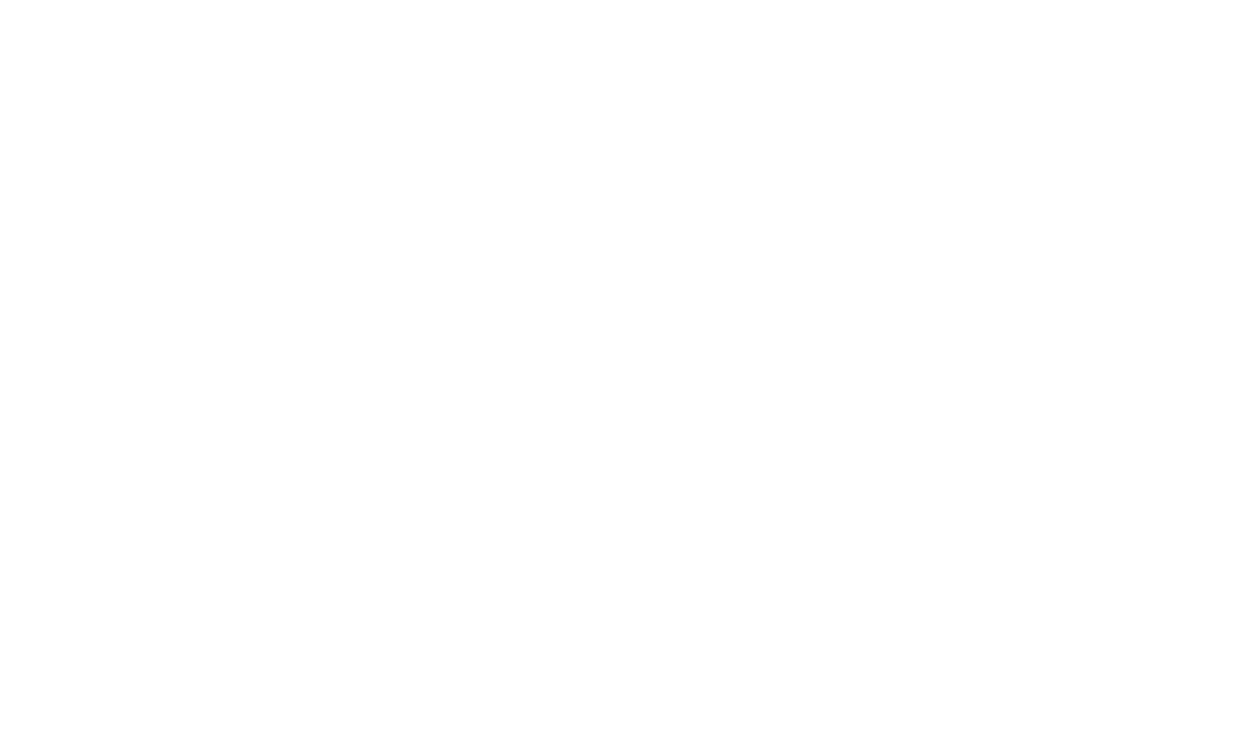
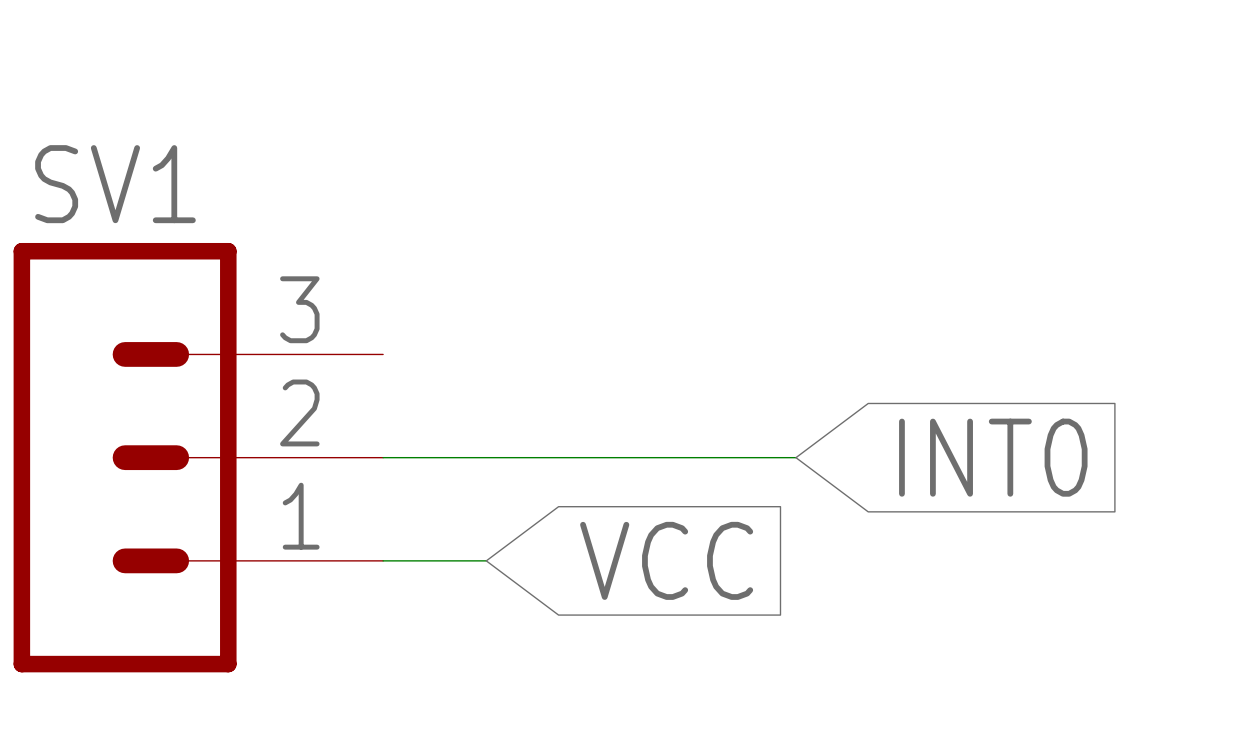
SV1: none -> (198, 457)
wire: none -> (383, 457) (795, 457)
global label: none -> INT0 (993, 457)
wire: none -> (383, 560) (486, 560)
global label: none -> VCC (666, 560)

